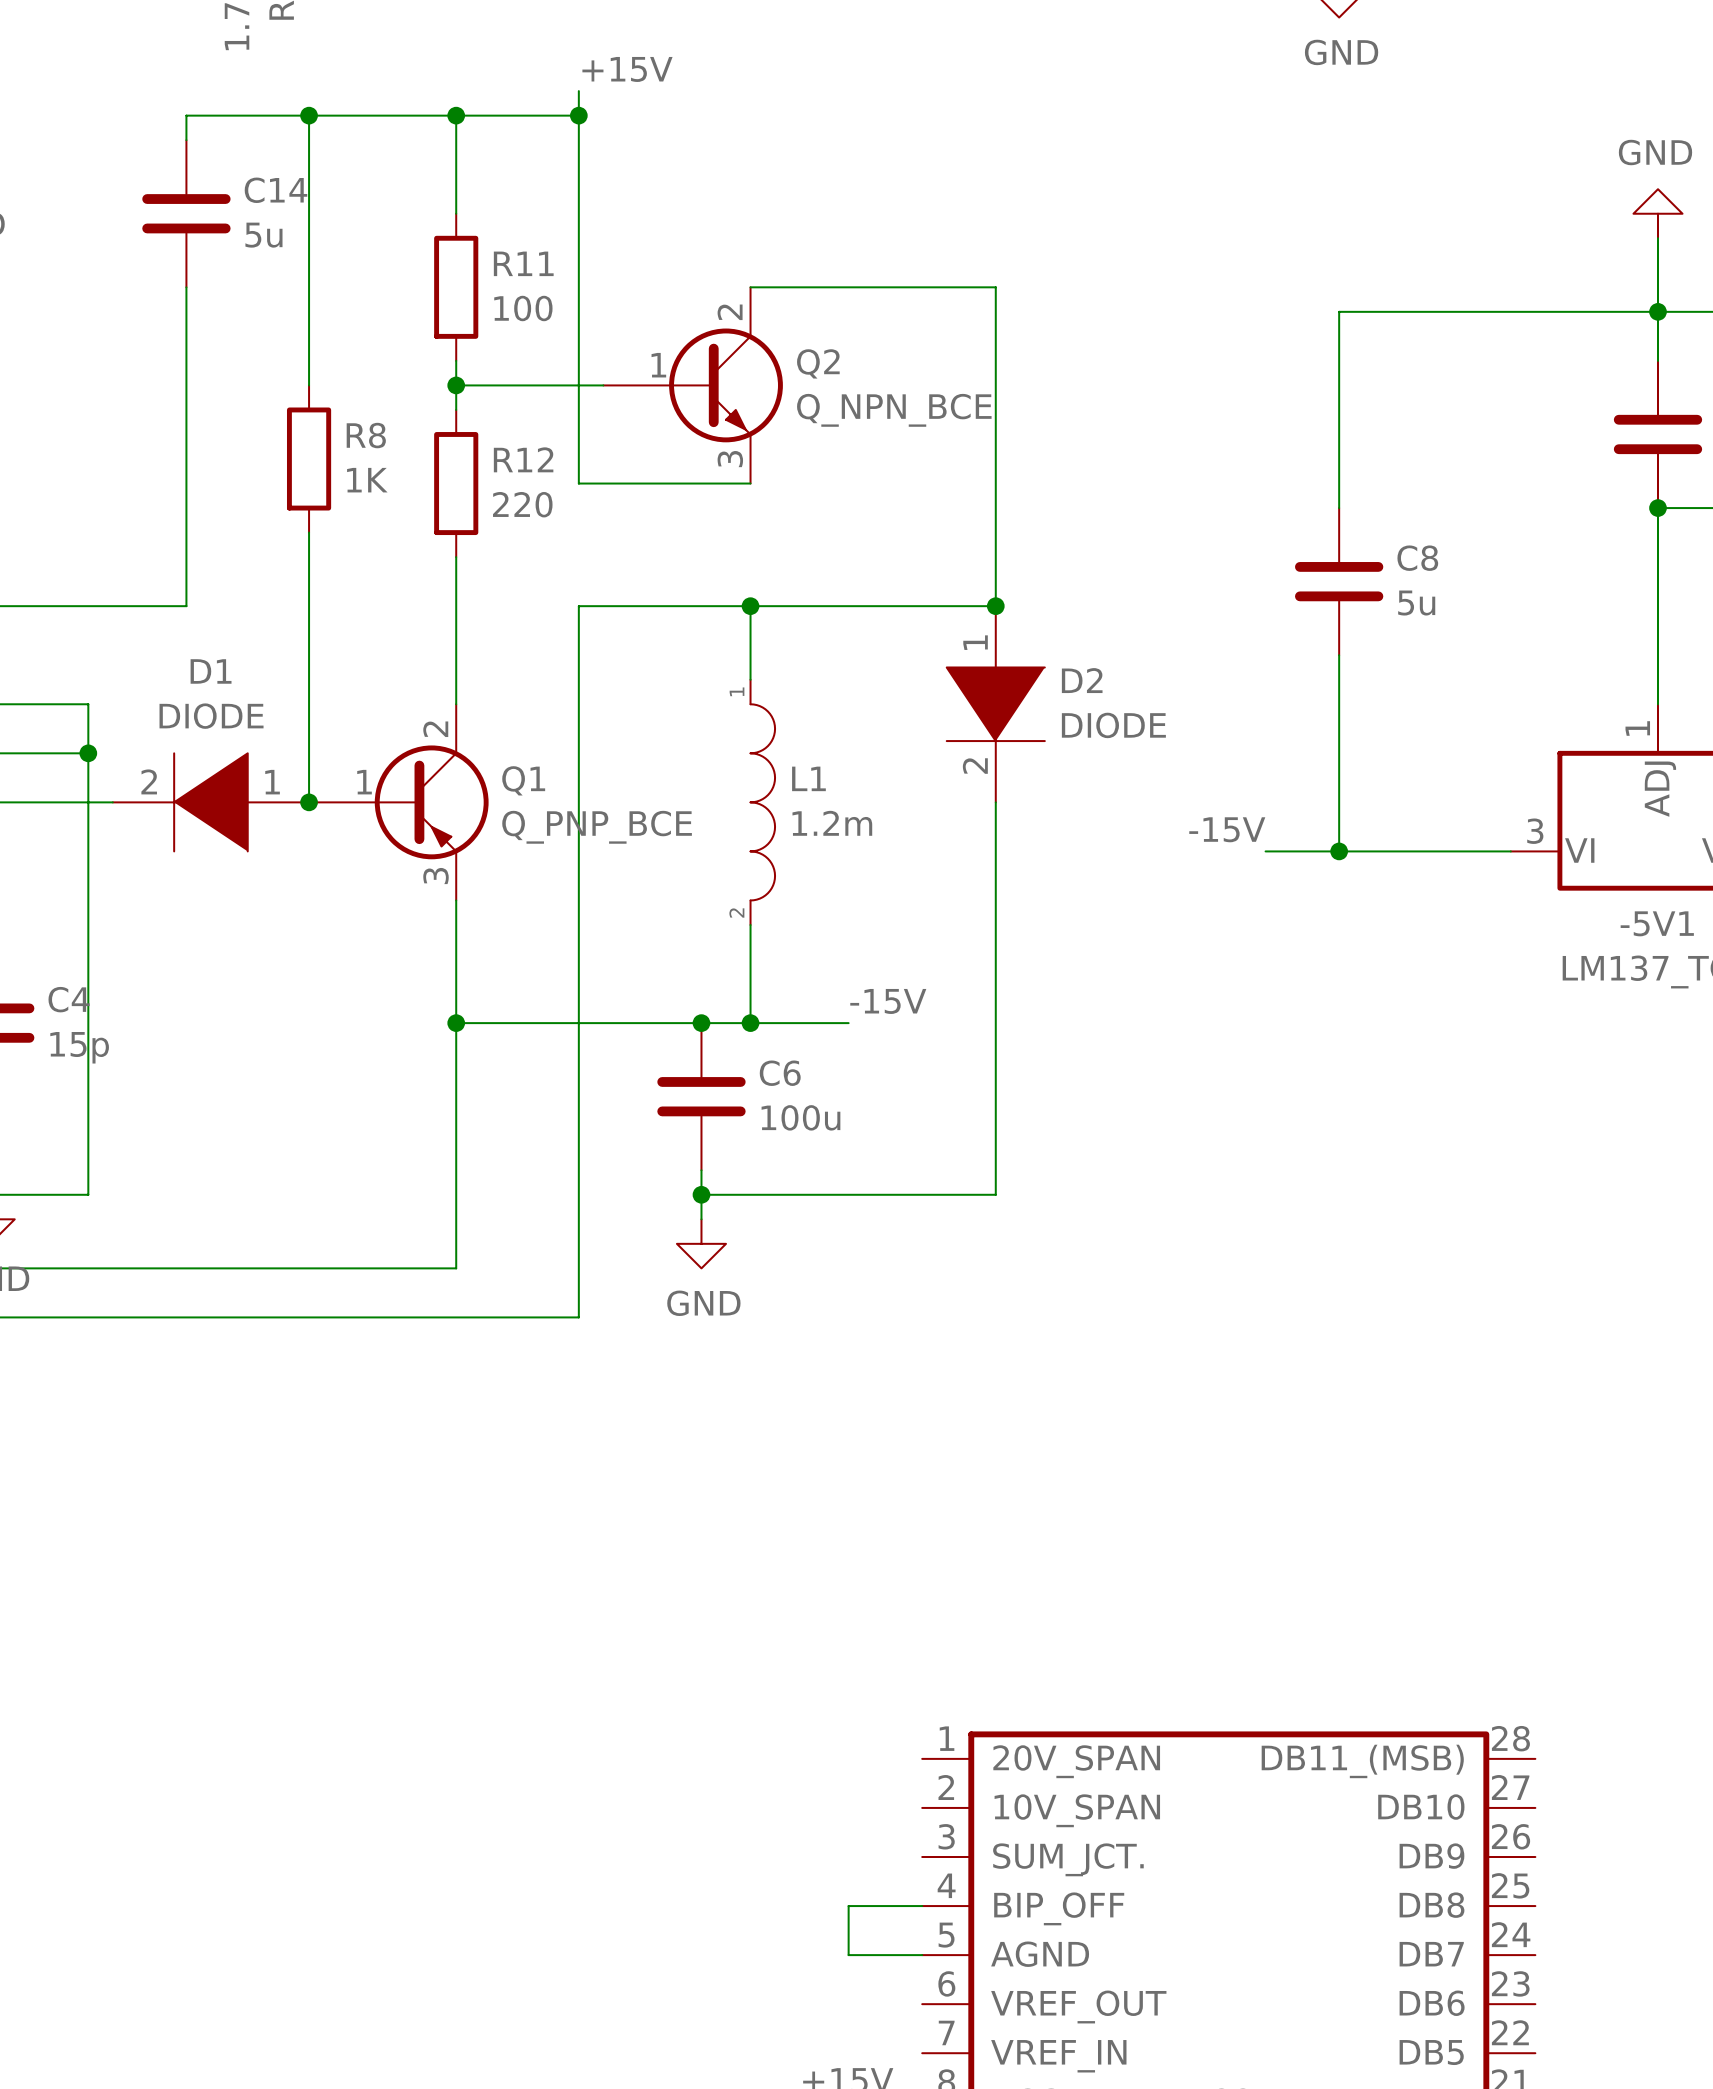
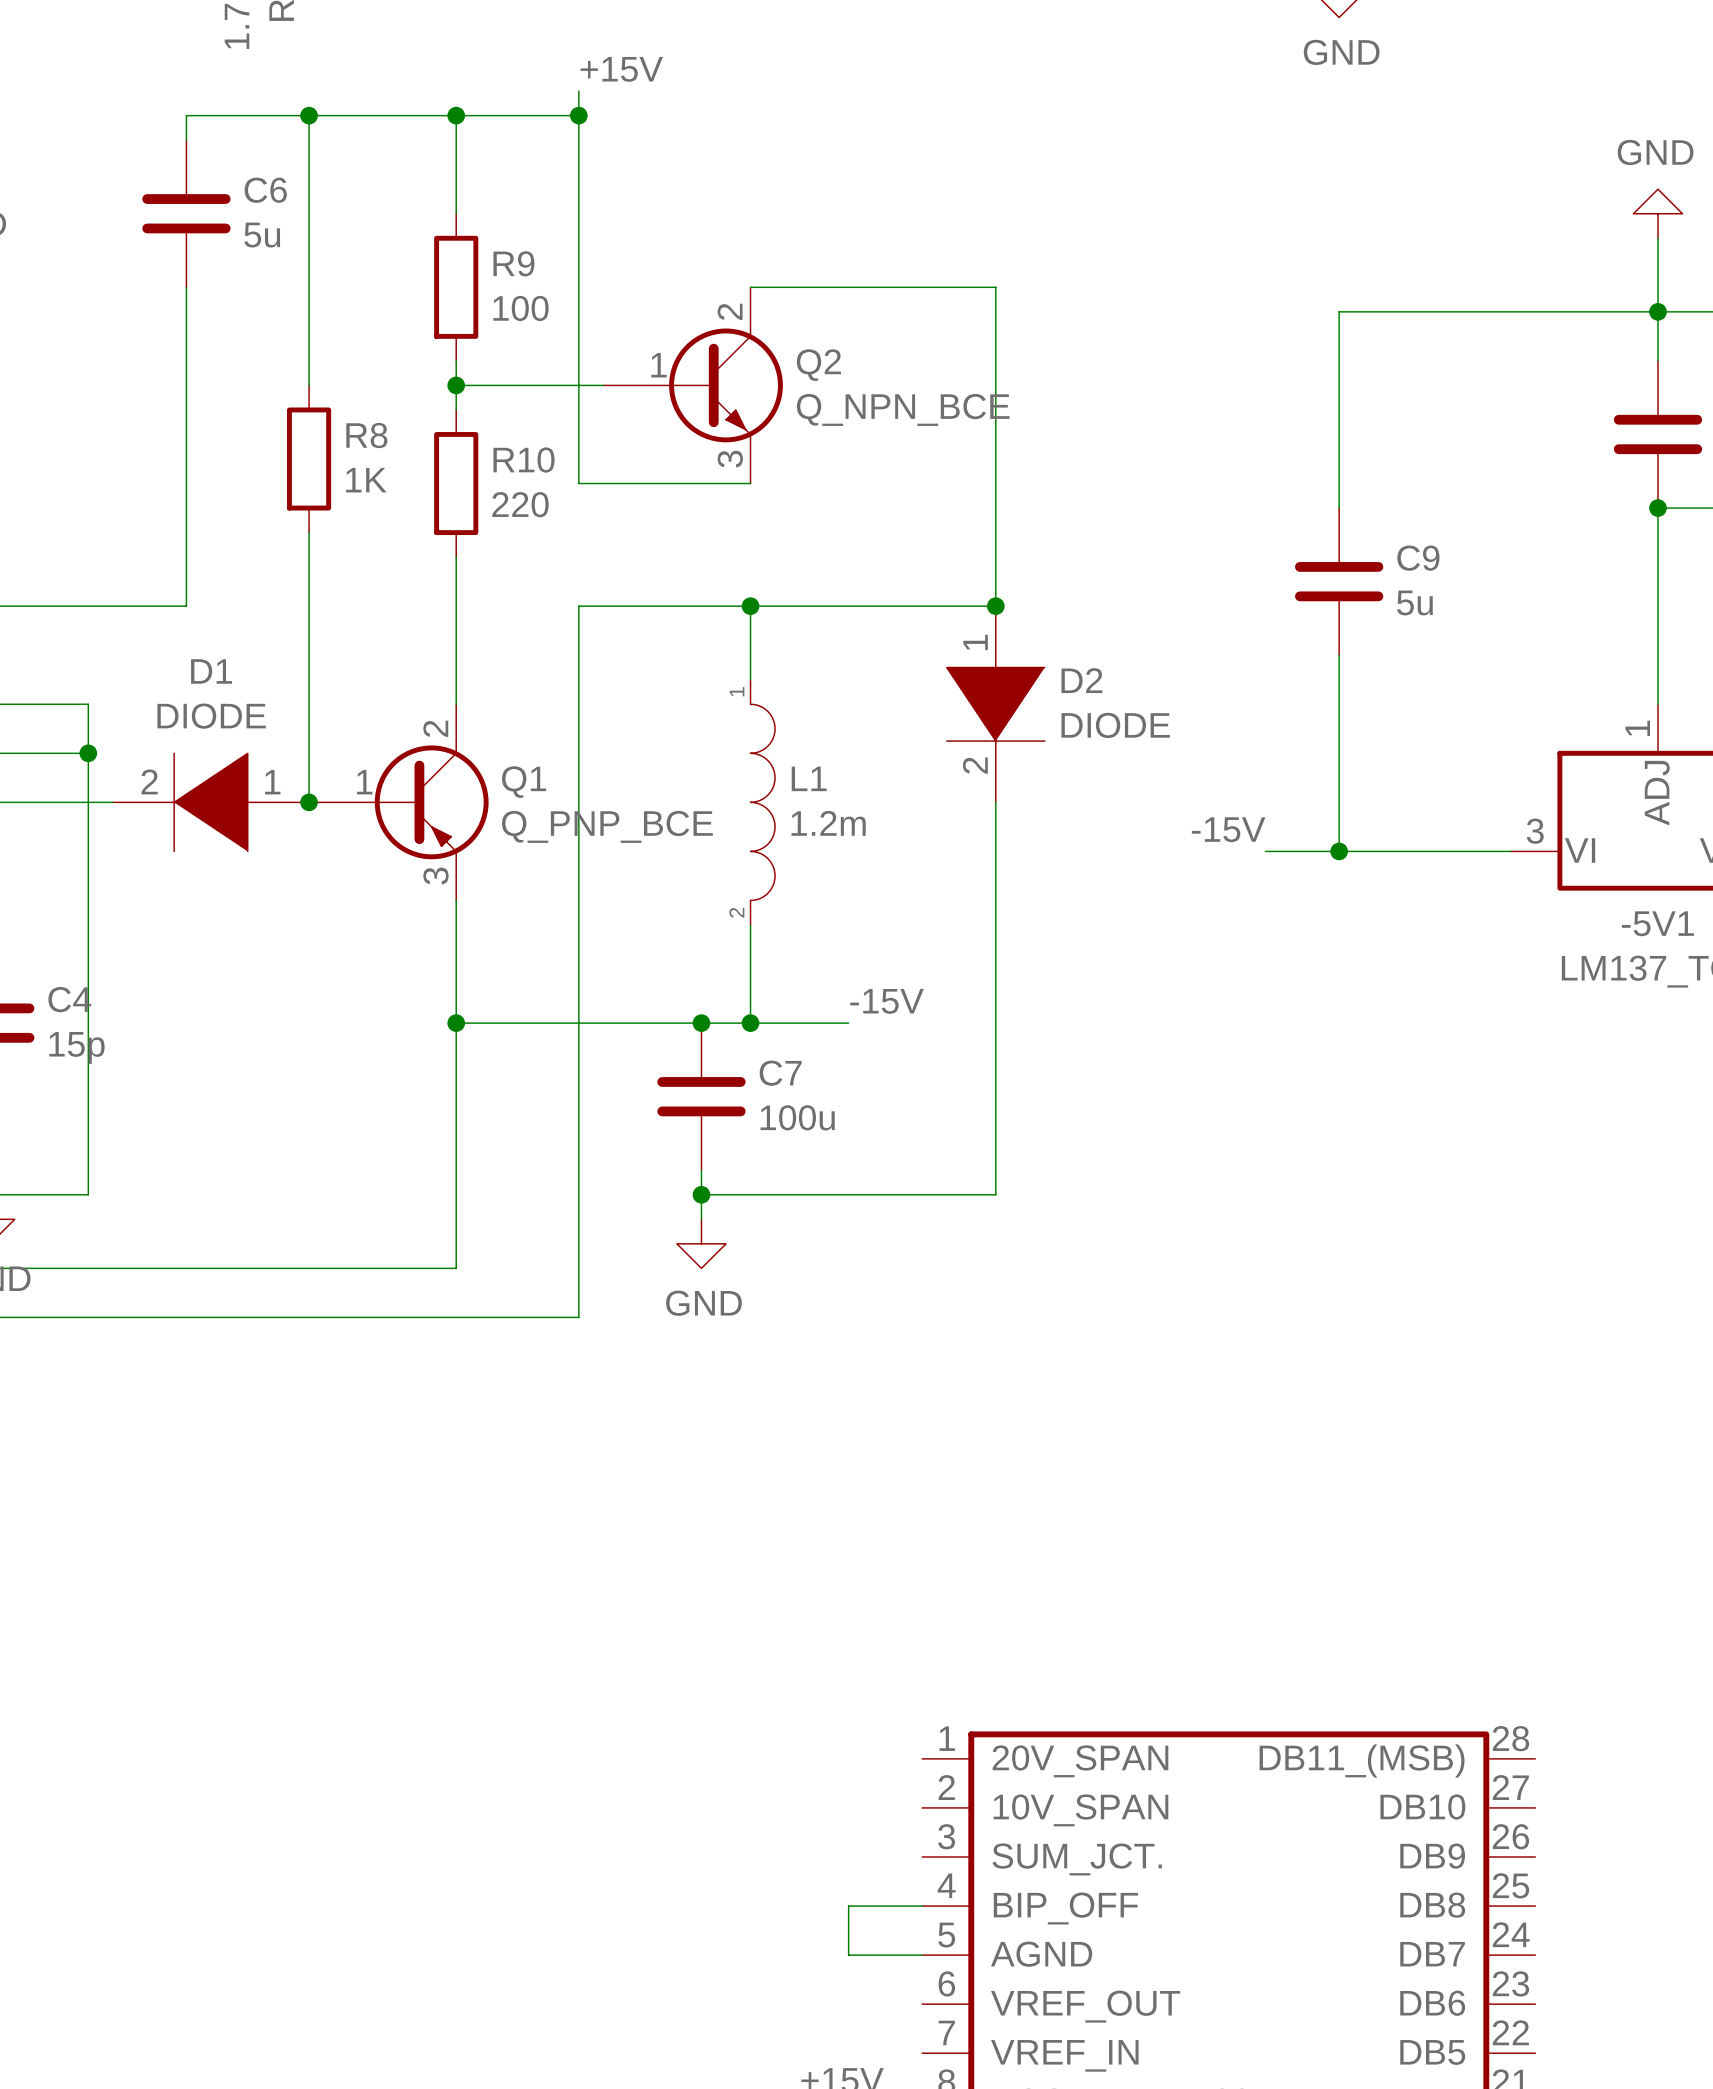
C14 name: C14 (275, 190) -> C6 (265, 190)
R11 name: R11 (523, 263) -> R9 (513, 263)
R12 name: R12 (523, 459) -> R10 (524, 460)
C8 name: C8 (1417, 558) -> C9 (1418, 558)
C6 name: C6 (780, 1073) -> C7 (780, 1073)

